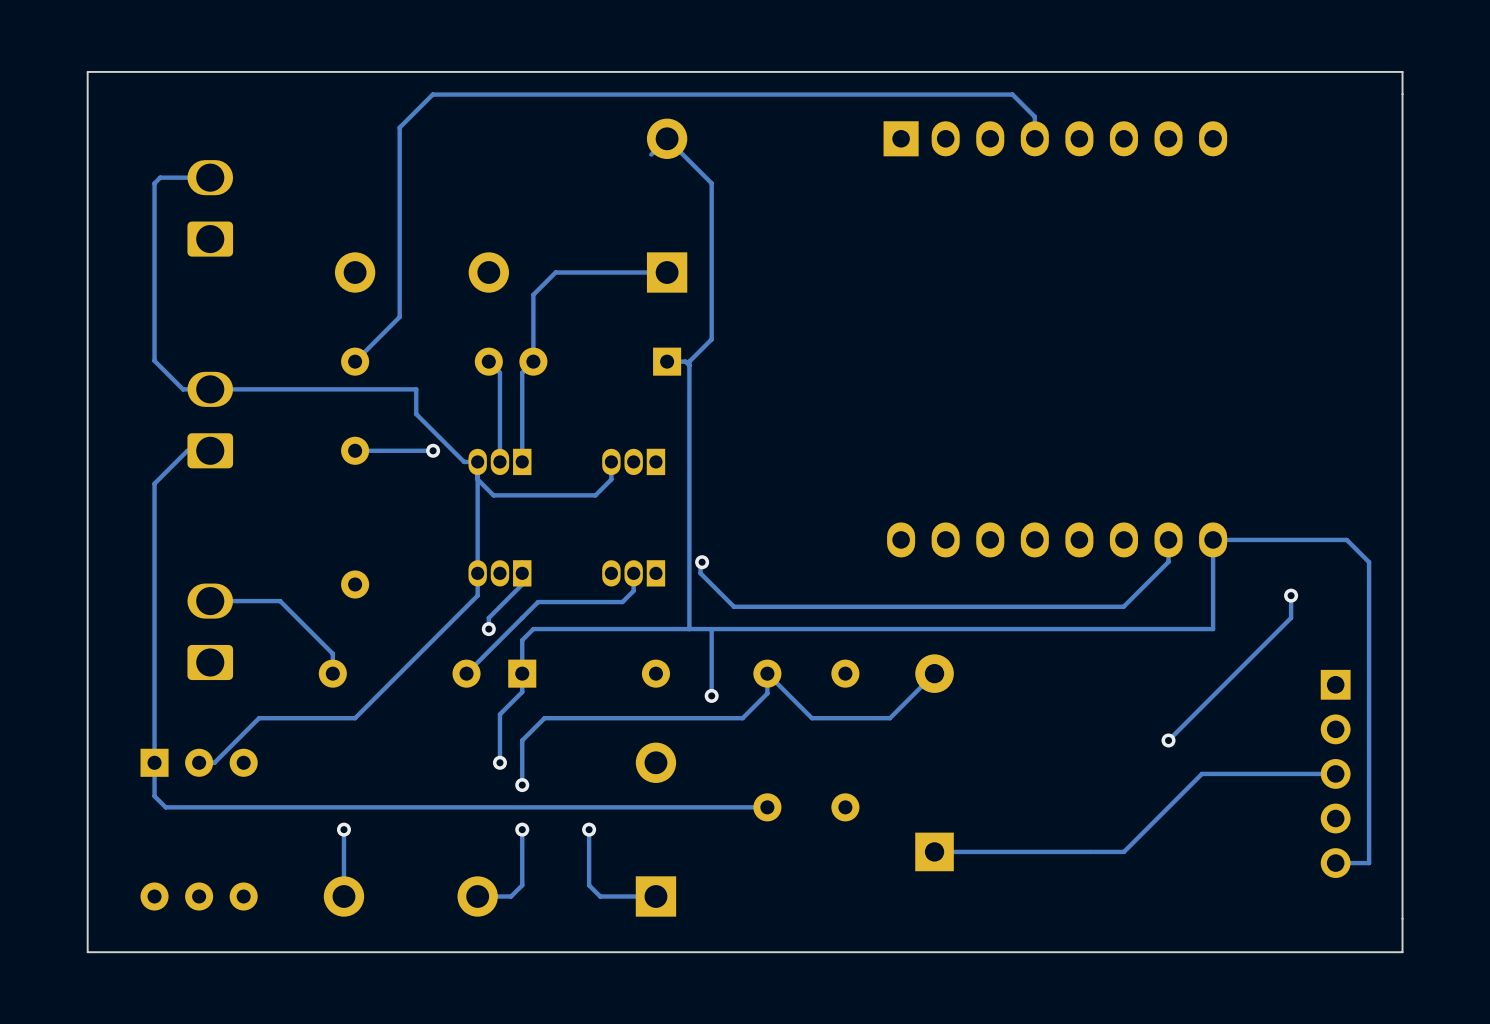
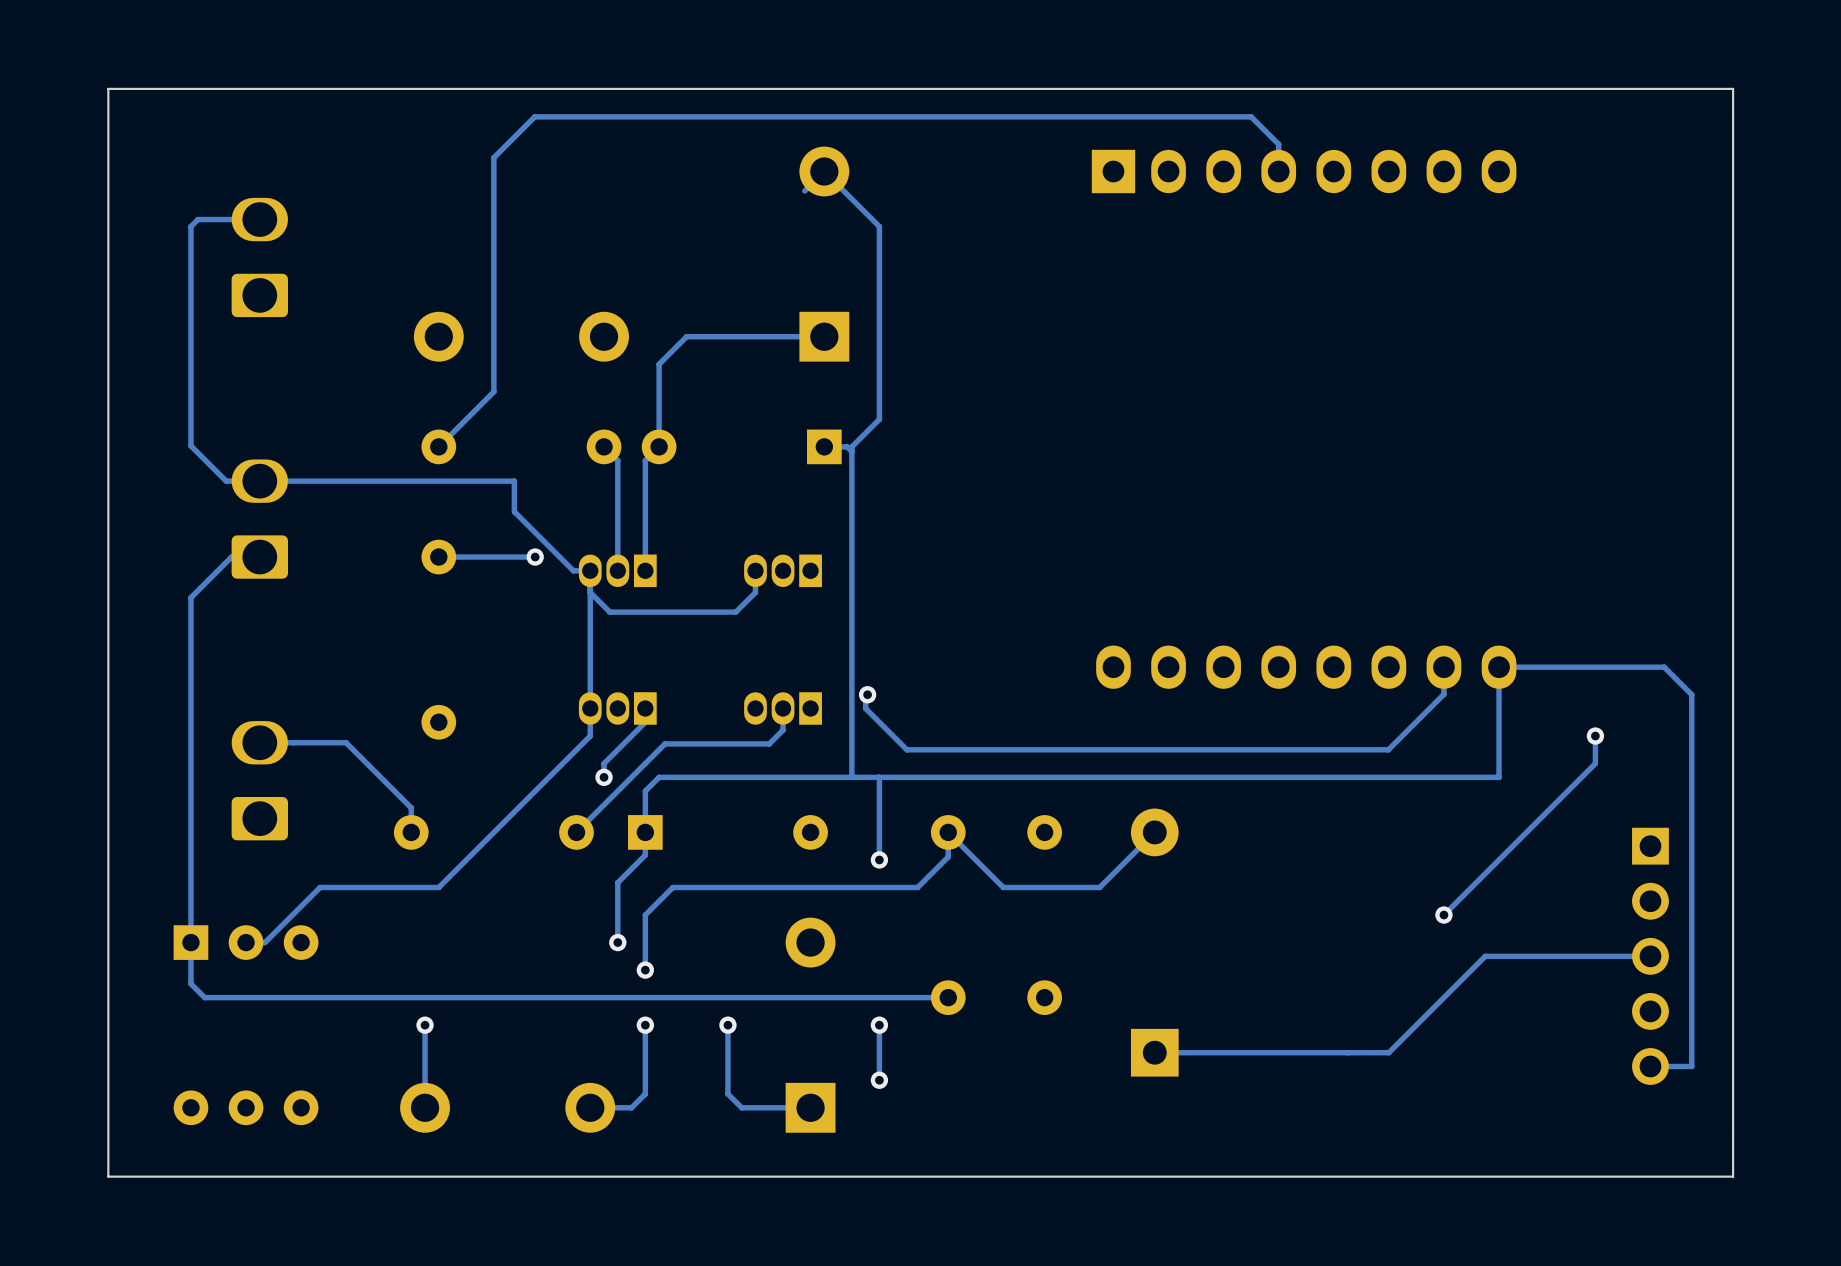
track: none -> (879, 1025) (879, 1080)
via: none -> (879, 1025)
via: none -> (879, 1080)

